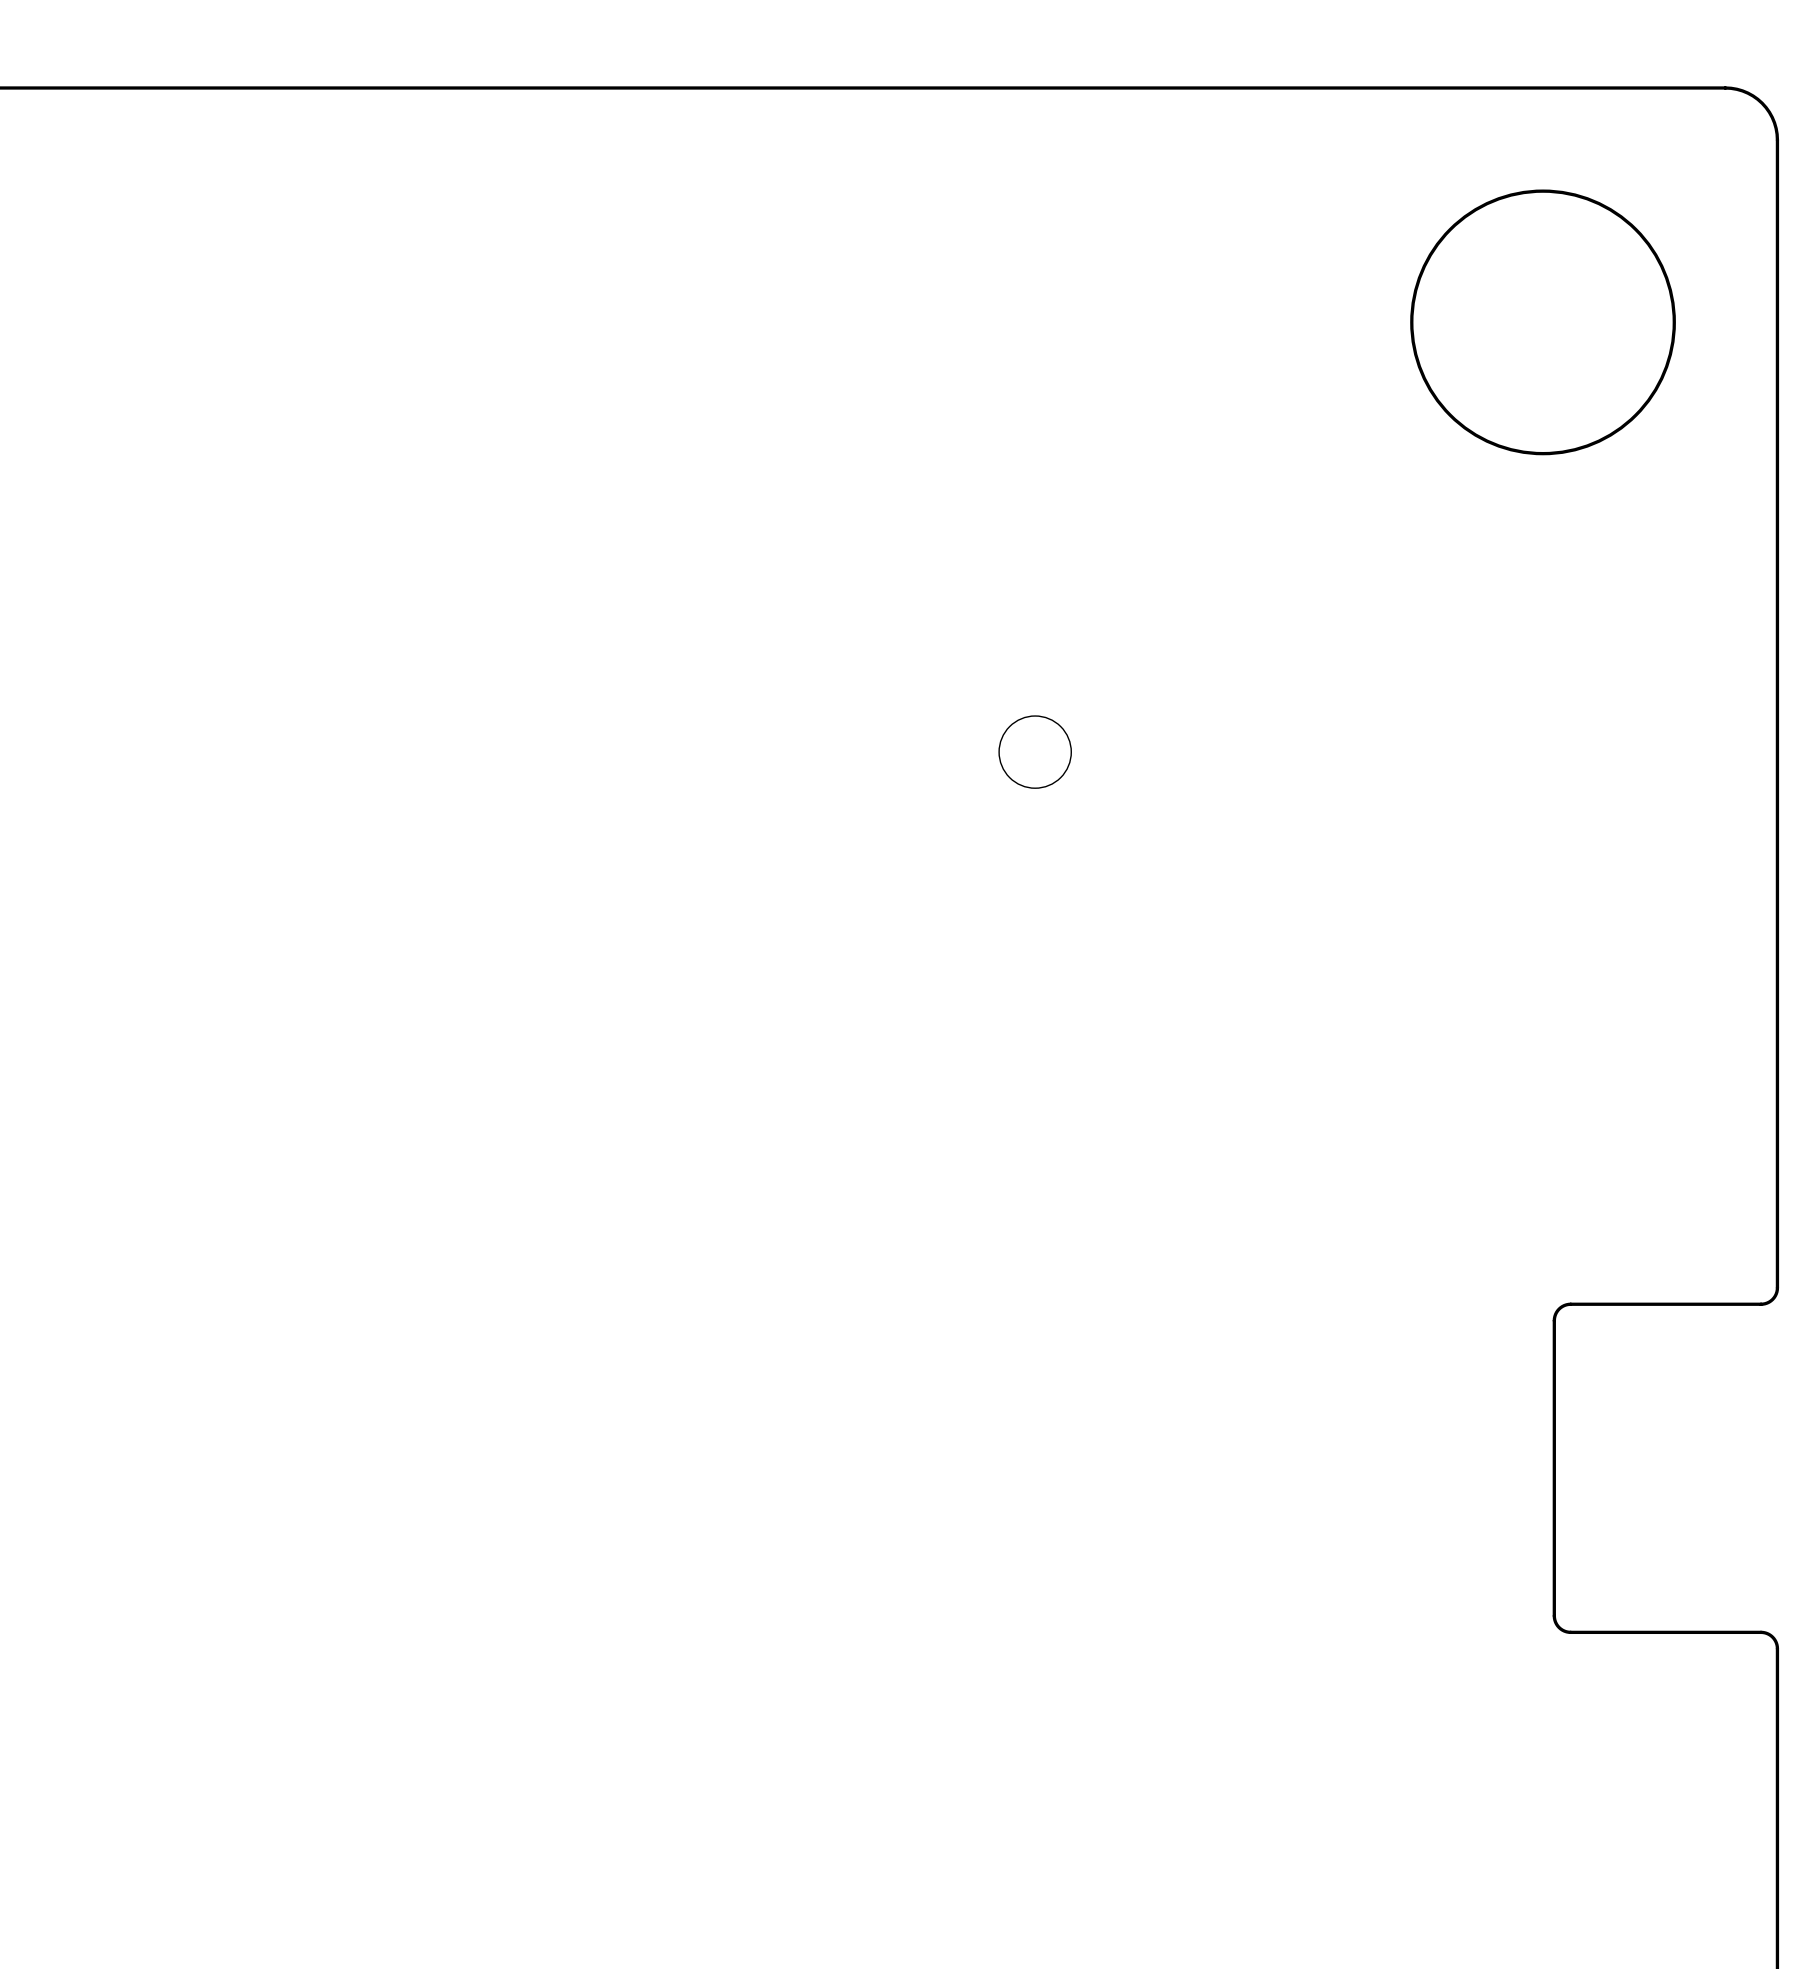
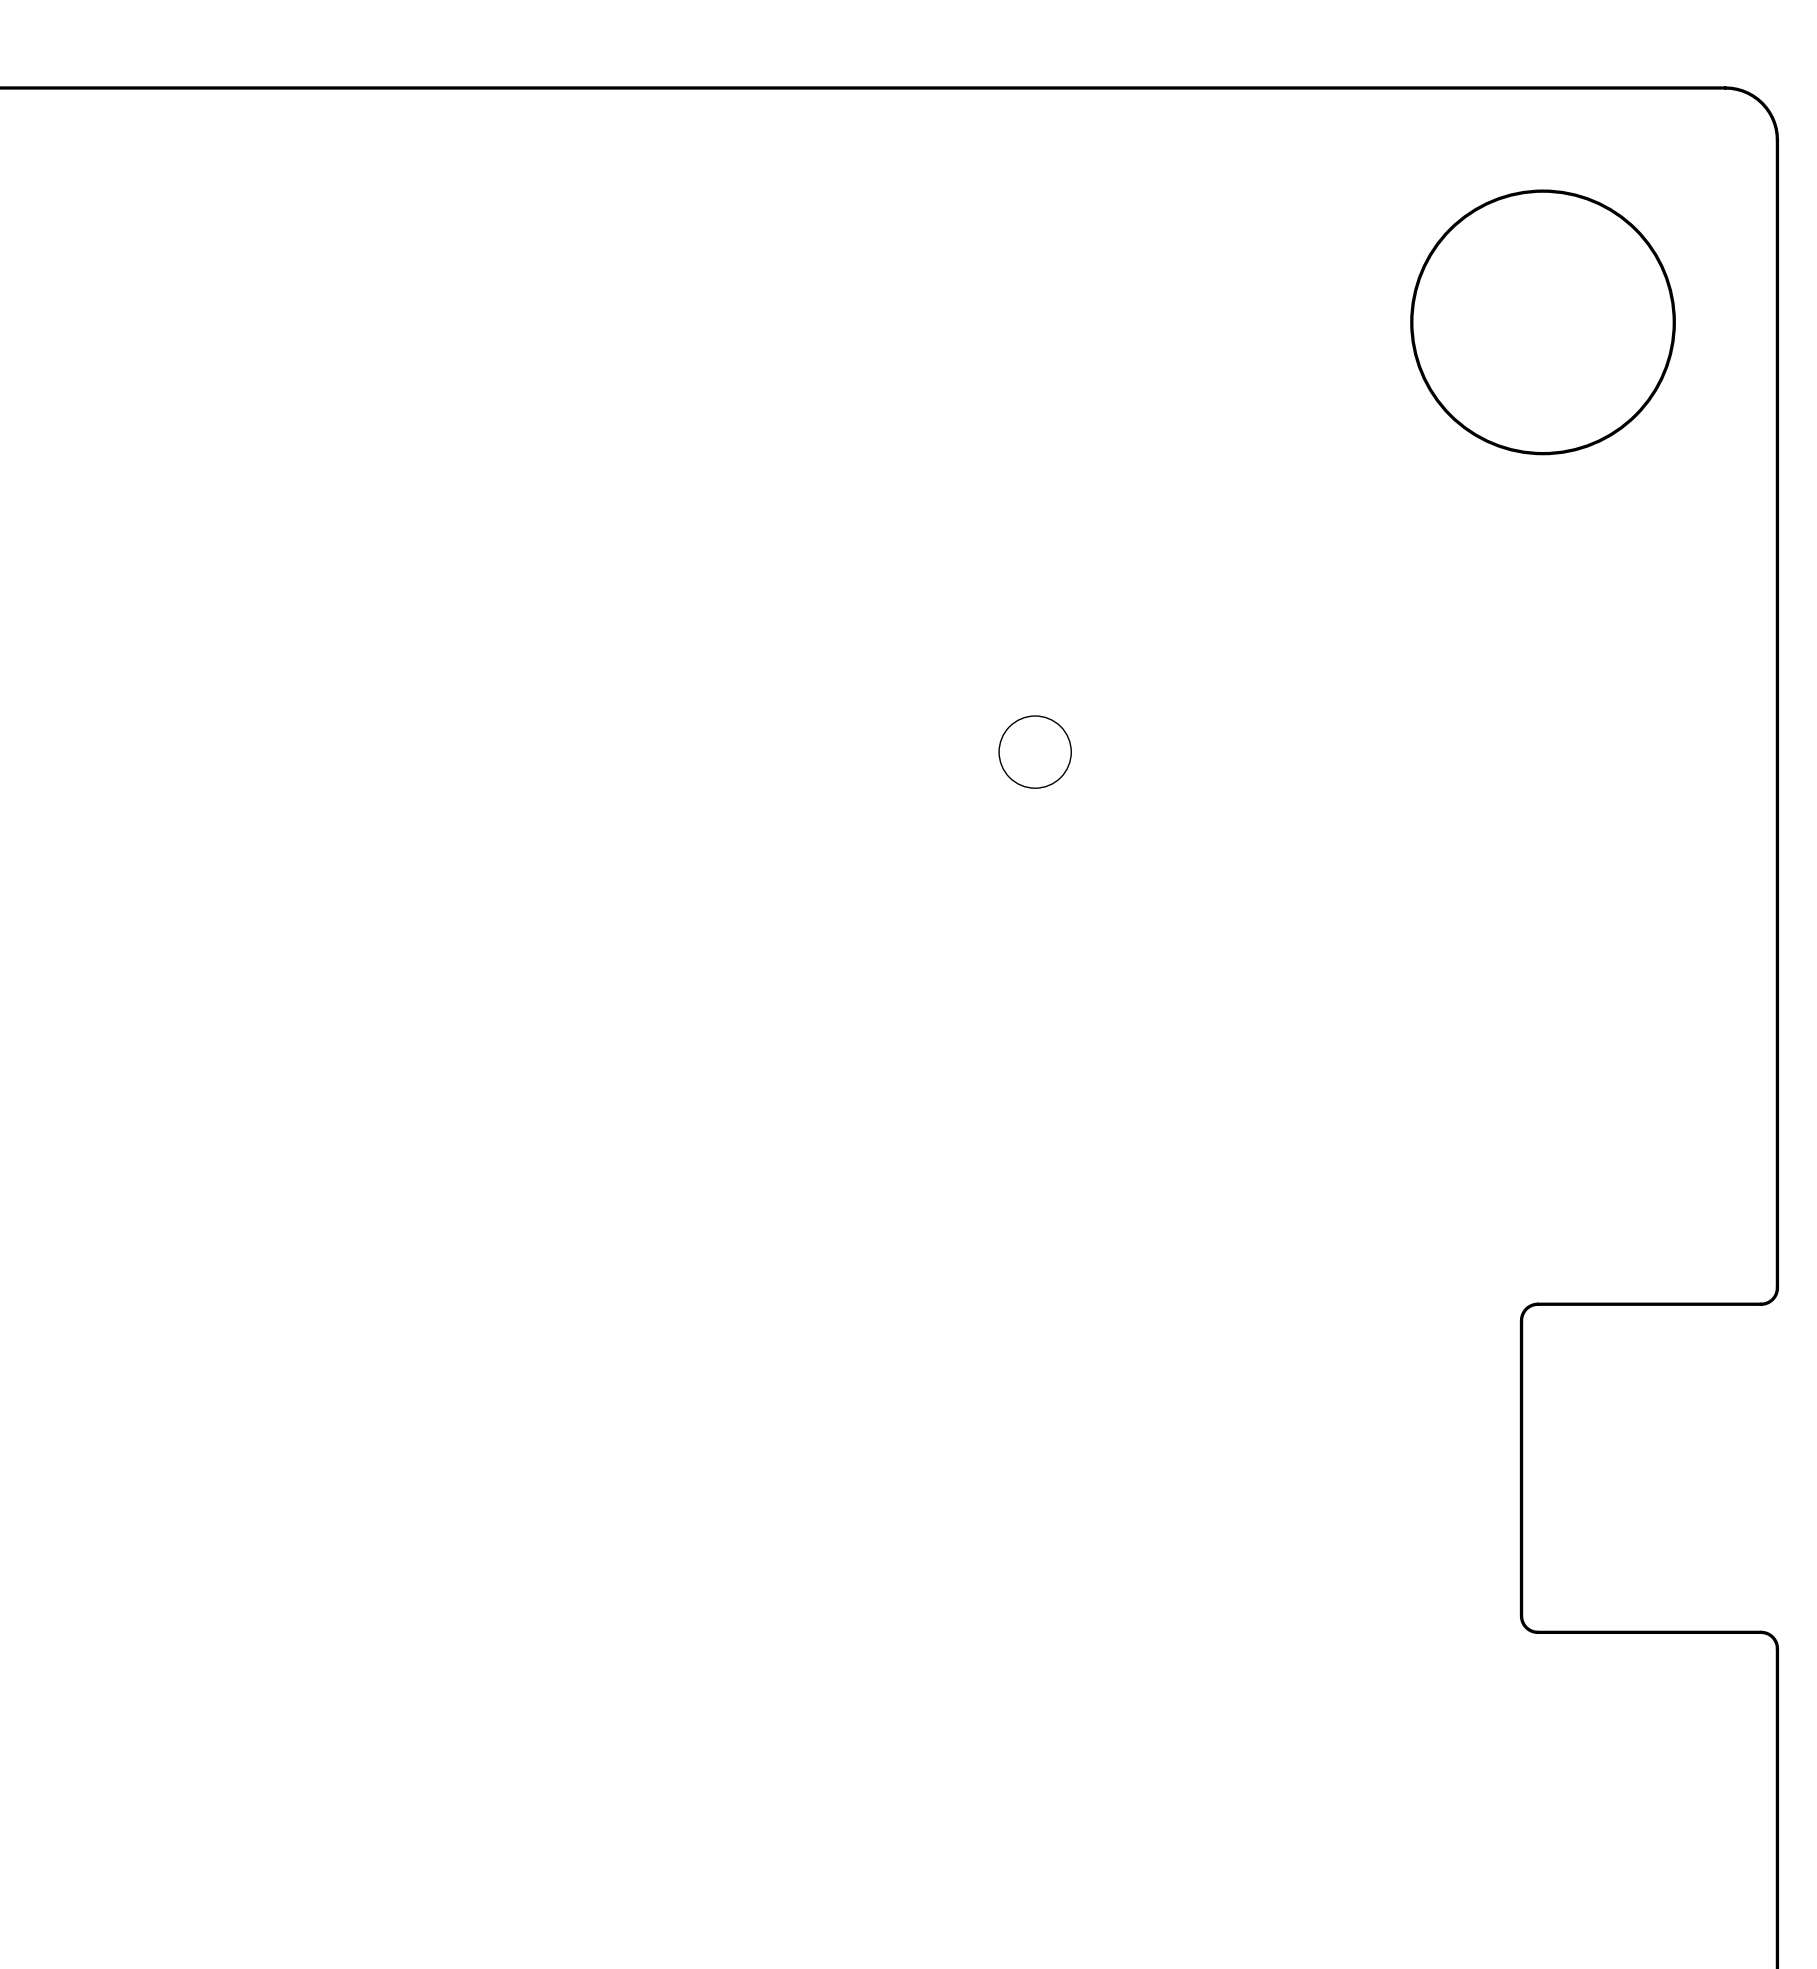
board edge: (1570, 1304) (1559, 1309) (1554, 1320) (1554, 1615) (1559, 1627) (1570, 1632) -> (1570, 1304) (1533, 1304) (1524, 1310) (1521, 1320) (1521, 1618) (1524, 1625) (1533, 1631) (1570, 1632)

